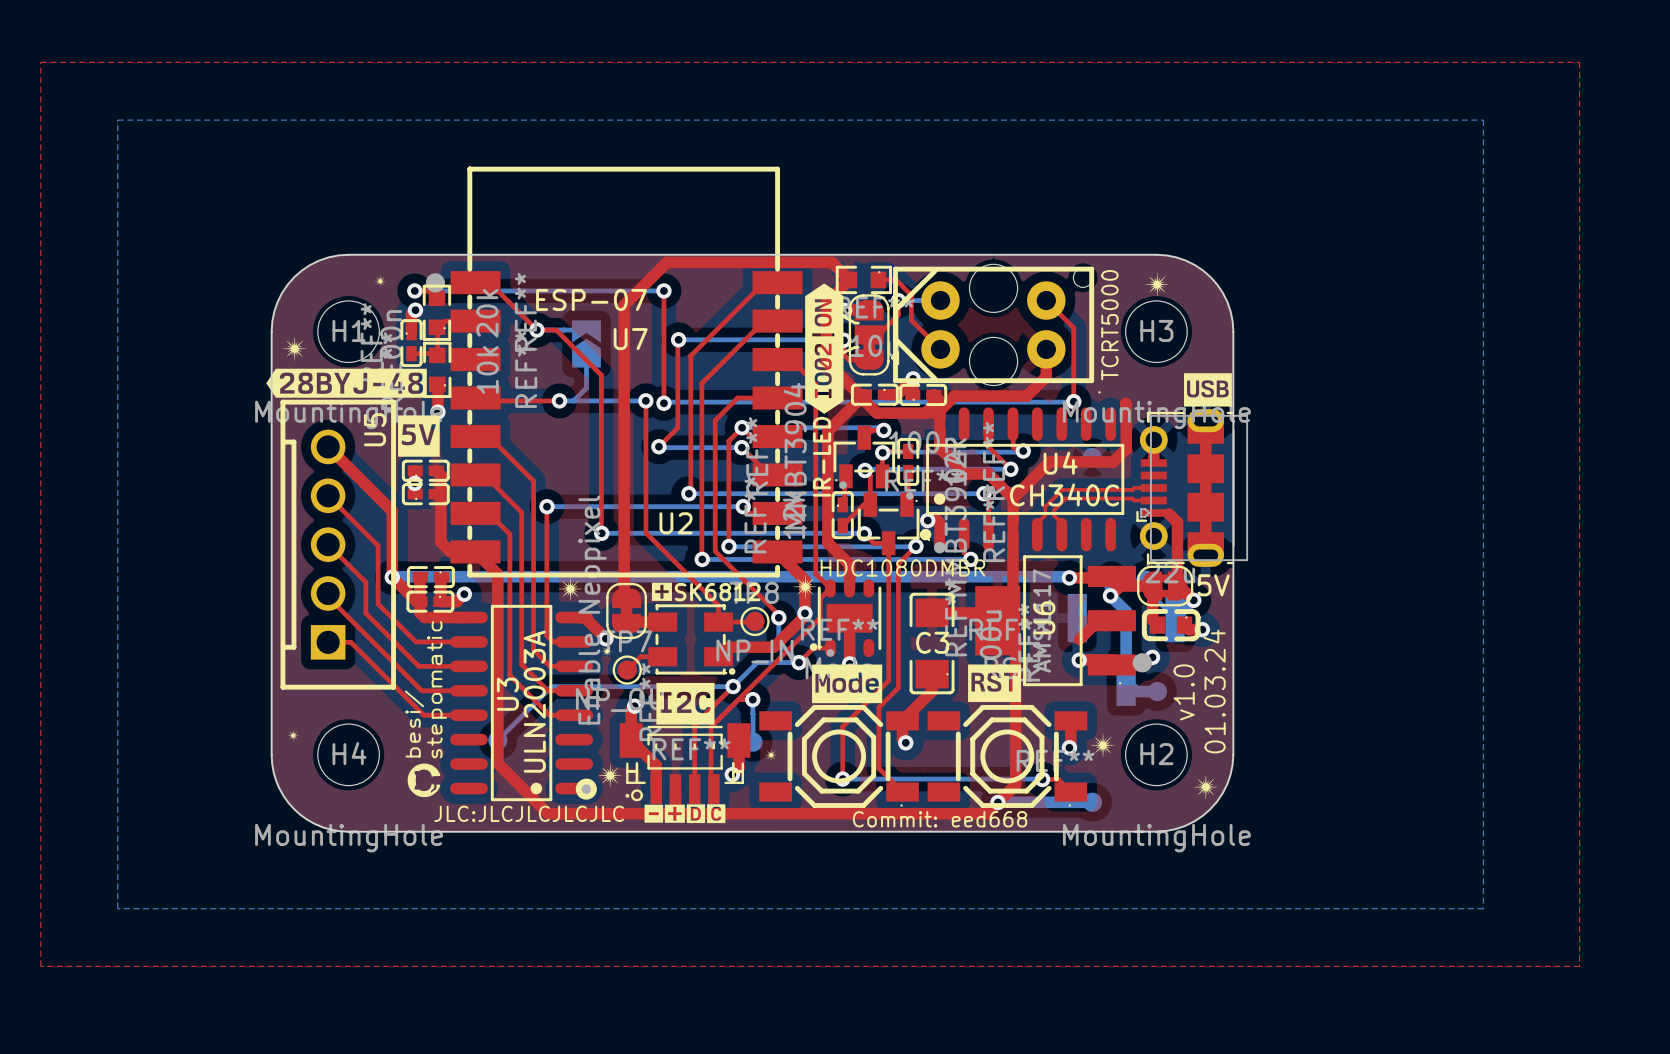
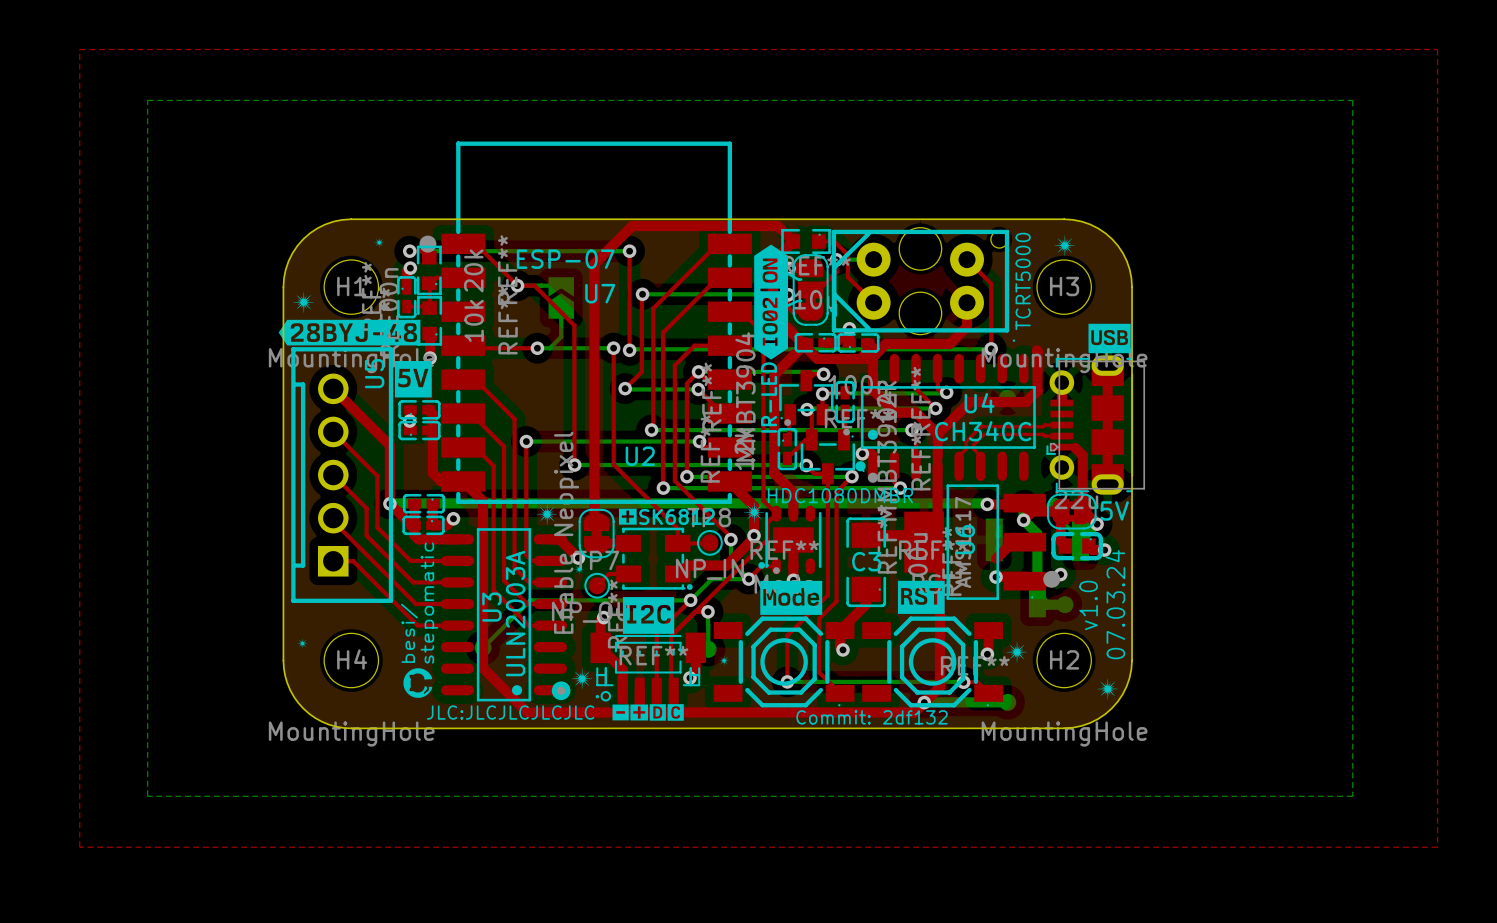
text: 01.03.24 (1214, 691) -> 07.03.24 (1115, 604)
text: Commit: eed668 (940, 819) -> Commit: 2df132 (872, 717)

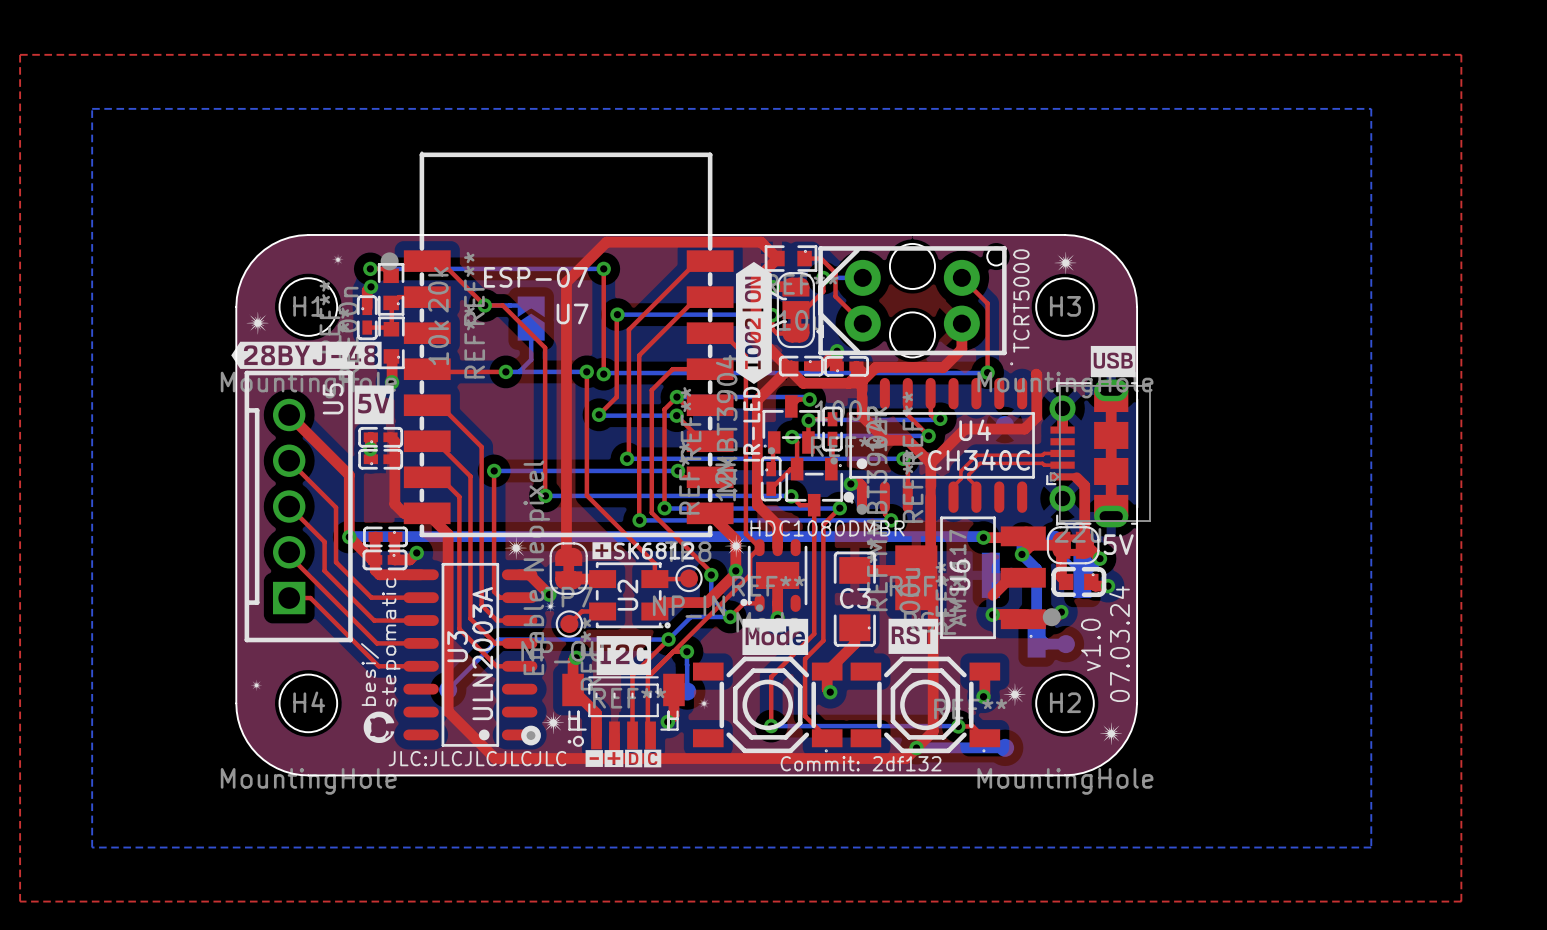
U2 name rotation: 0° (640, 456) -> 90° counterclockwise (627, 595)
U2 name position: U2 (640, 456) -> U2 (627, 595)

